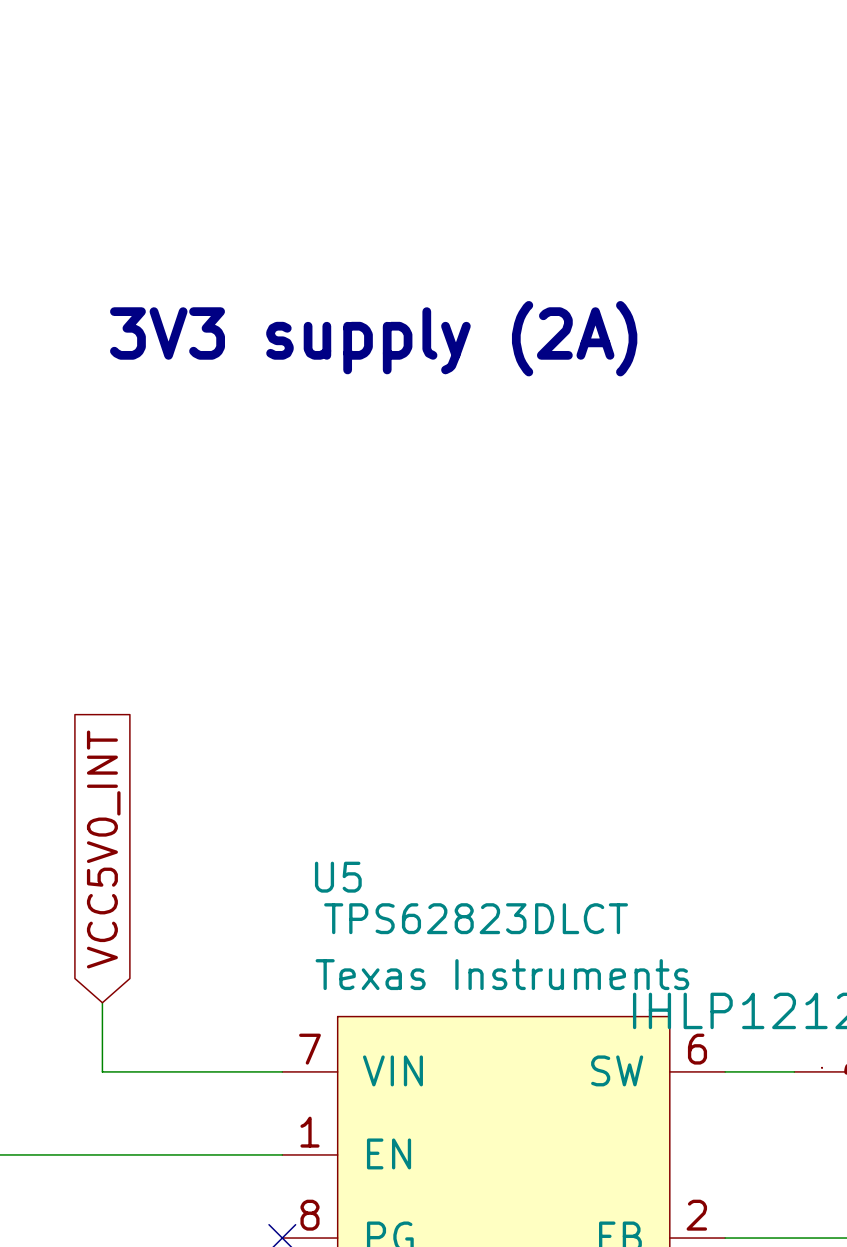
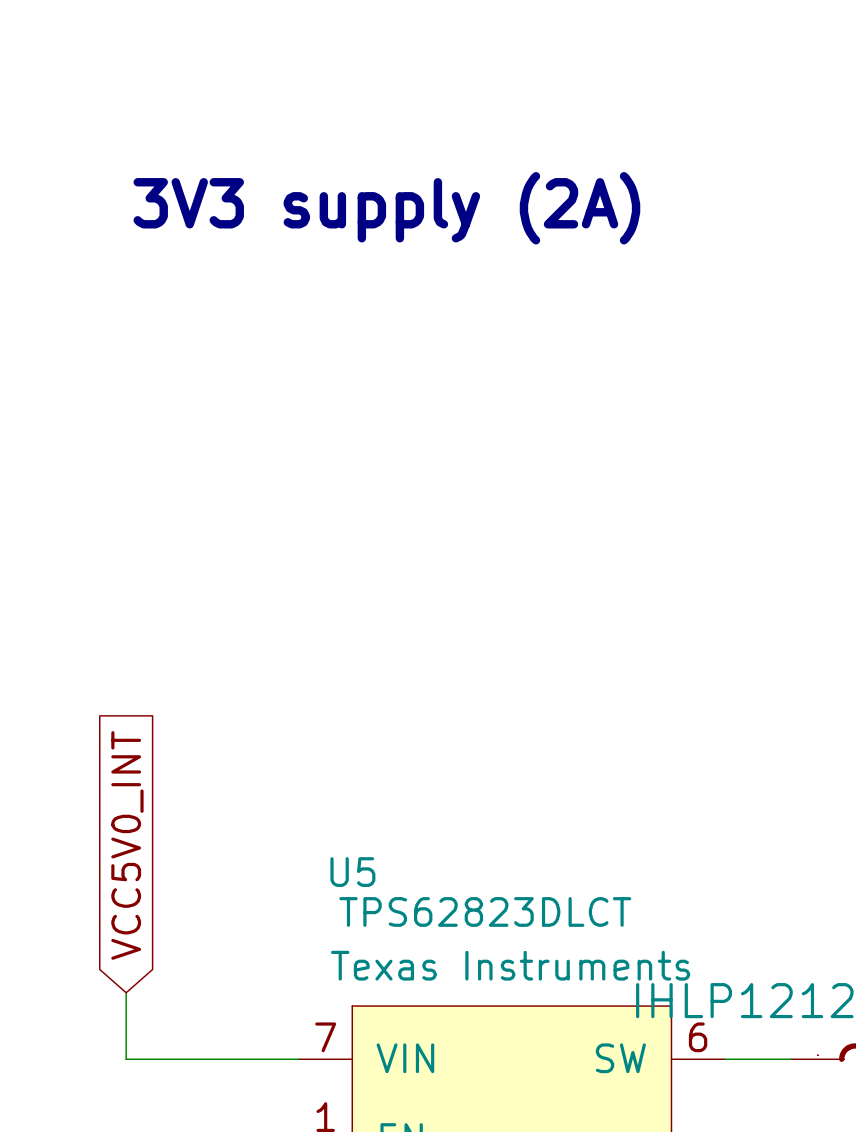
text position: 3V3 supply (2A) (373, 338) -> 3V3 supply (2A) (386, 208)

